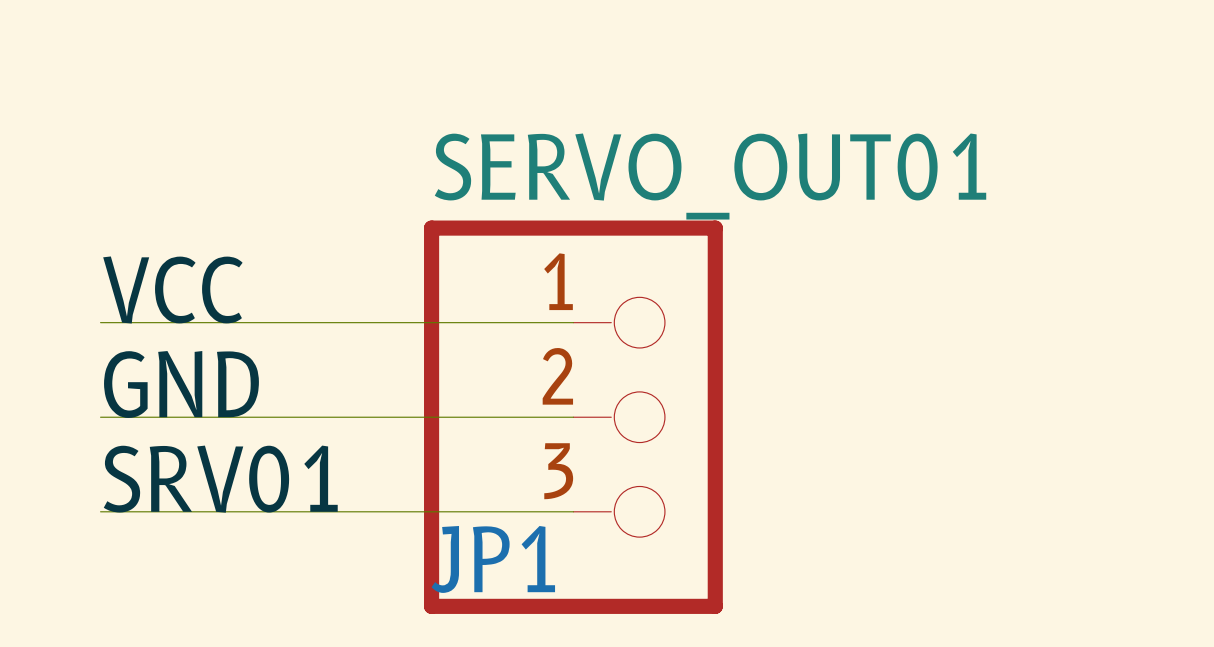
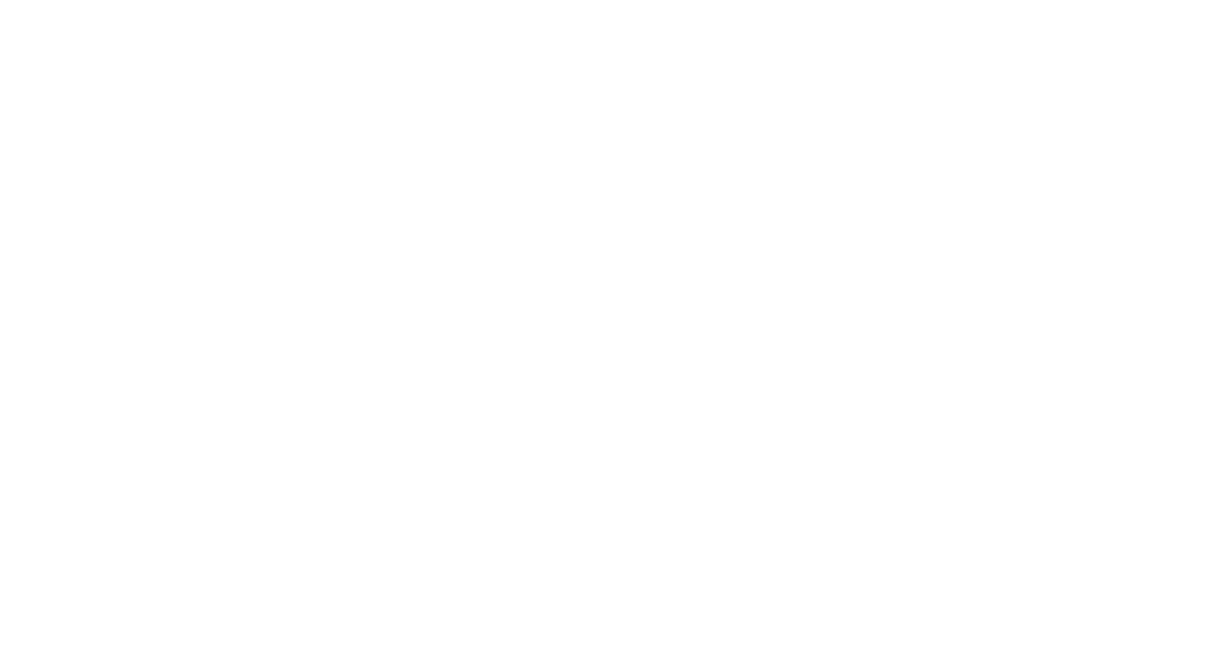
label: VCC (172, 289) -> none
wire: (100, 322) (573, 322) -> none
label: GND (181, 384) -> none
wire: (100, 417) (573, 417) -> none
JP1: SERVO_OUT01 (573, 417) -> none
label: SRV01 (220, 479) -> none
wire: (100, 511) (573, 511) -> none

